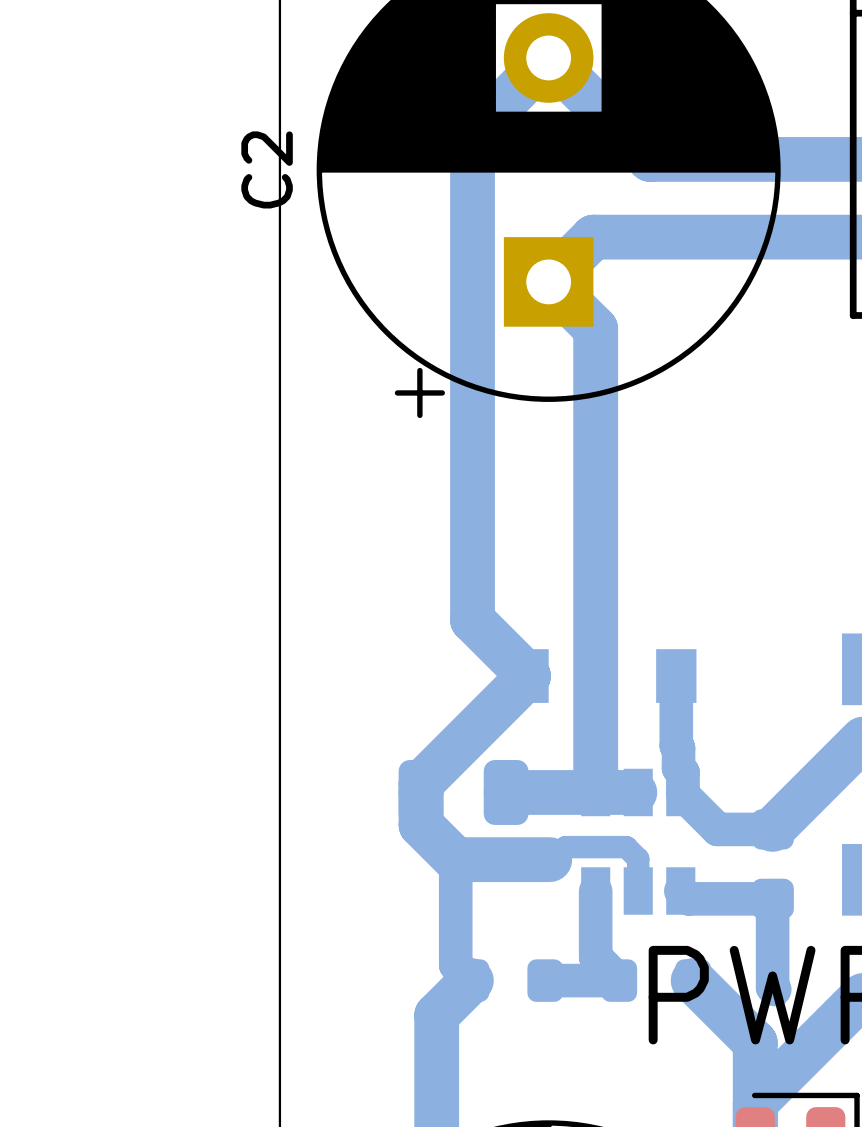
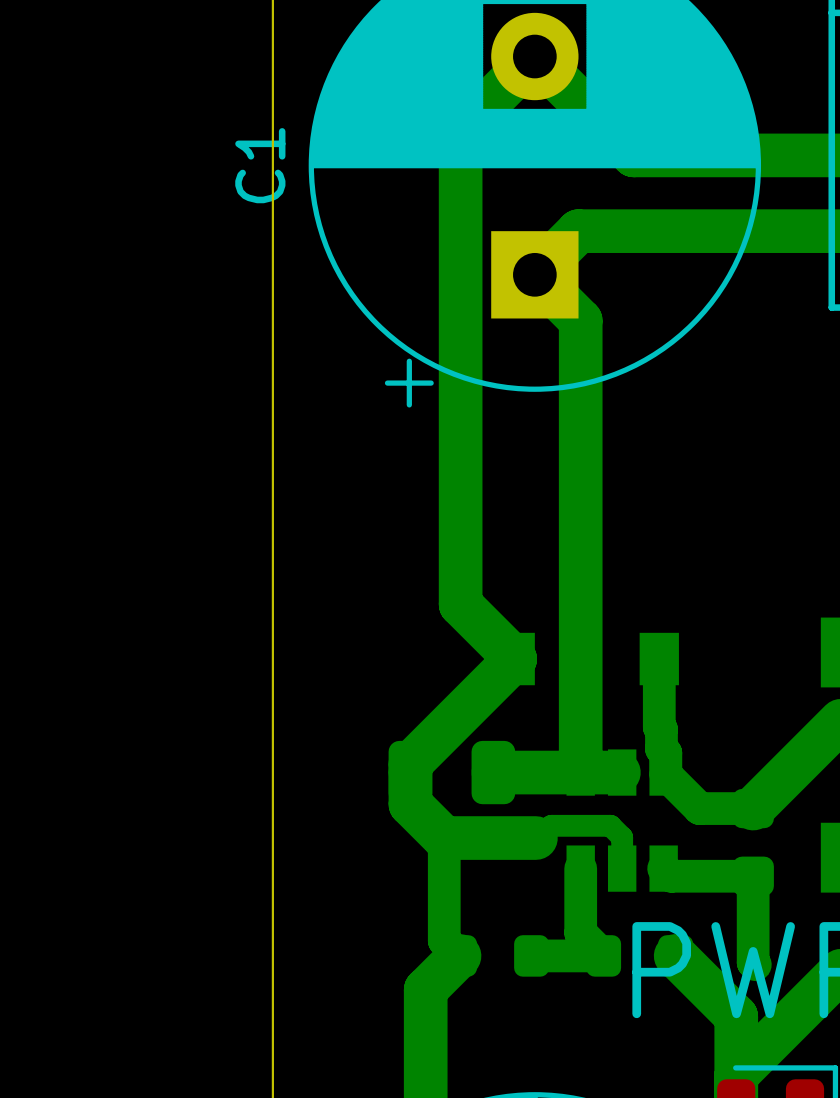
C2 name: C2 (267, 169) -> C1 (260, 165)

